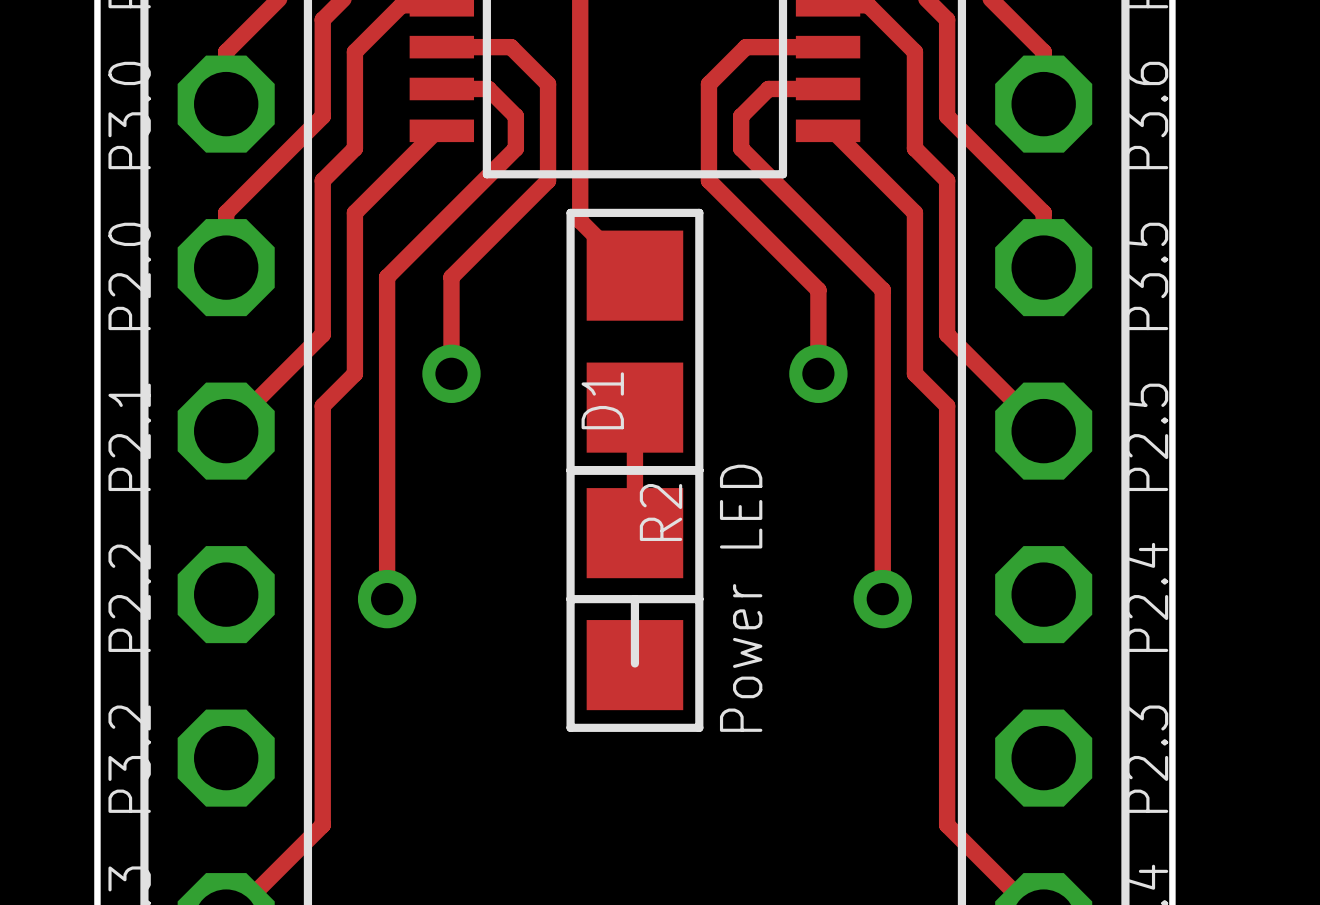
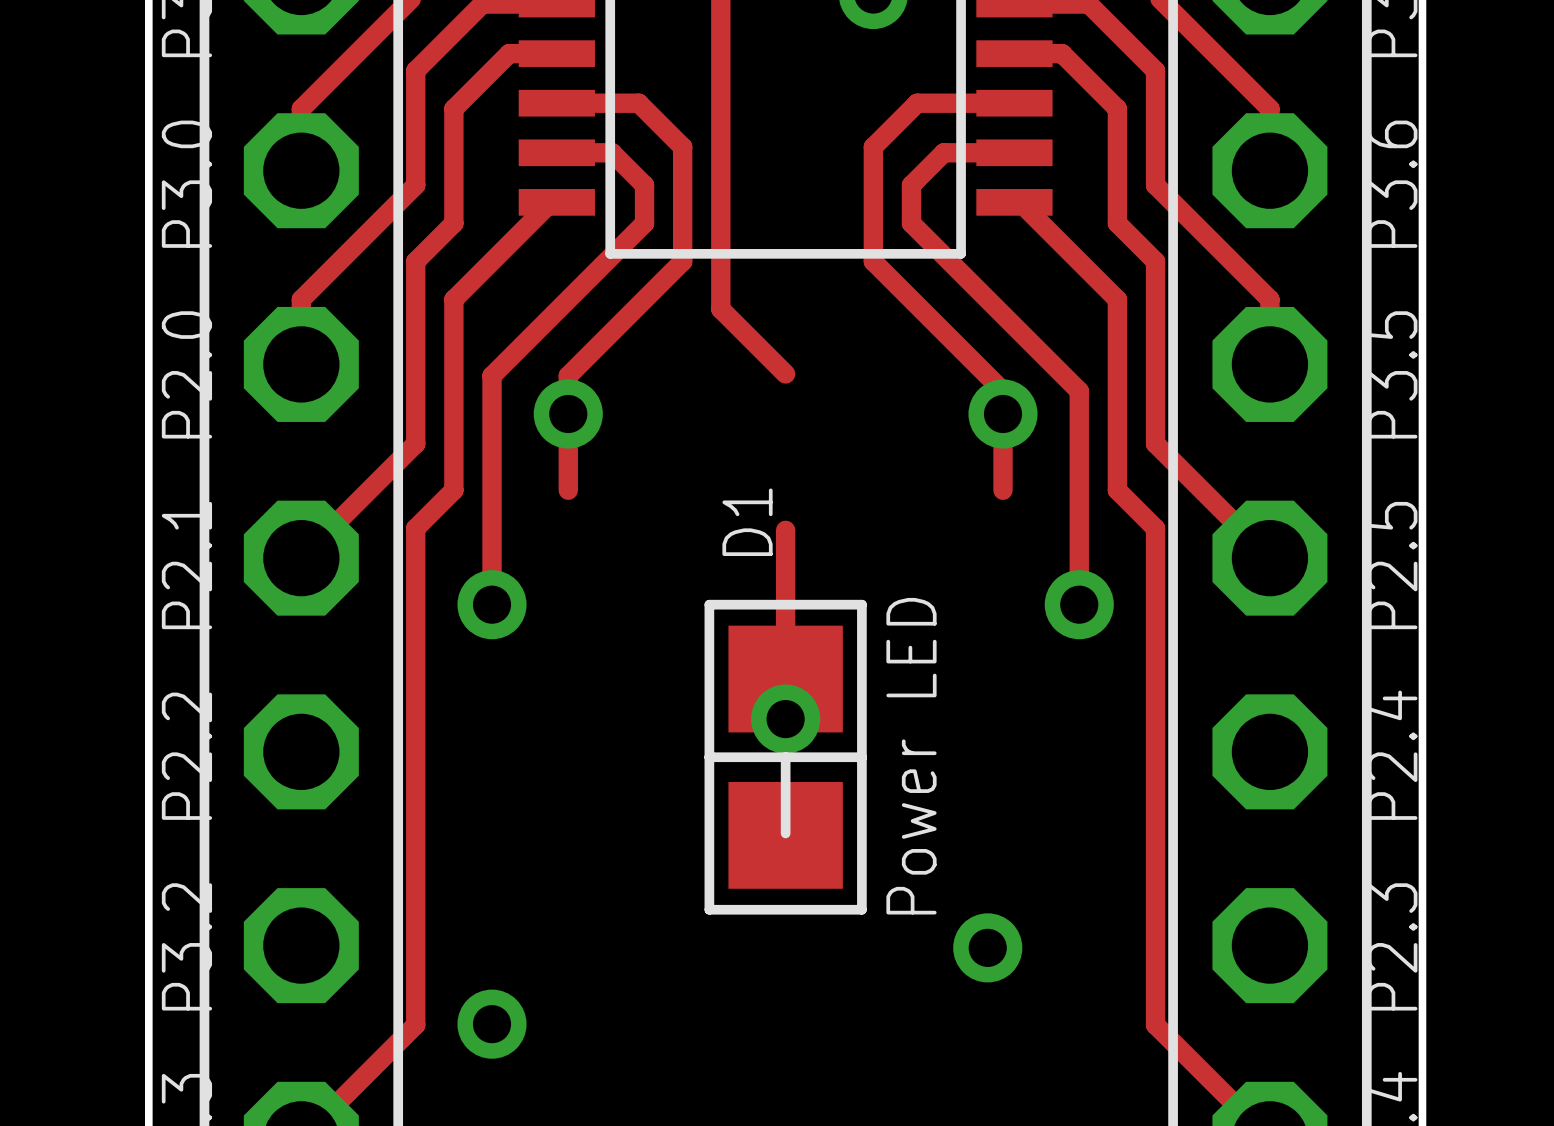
via: none -> (568, 414)
via: none -> (1003, 414)
R2: (634, 341) -> none
via: (451, 373) -> none
via: (818, 373) -> none
track: (387, 470) (387, 599) -> none
via: none -> (492, 604)
track: (882, 470) (882, 599) -> none
via: none -> (1079, 604)
via: none -> (785, 719)
via: (387, 599) -> none
via: (882, 599) -> none
via: none -> (987, 947)
via: none -> (492, 1024)

